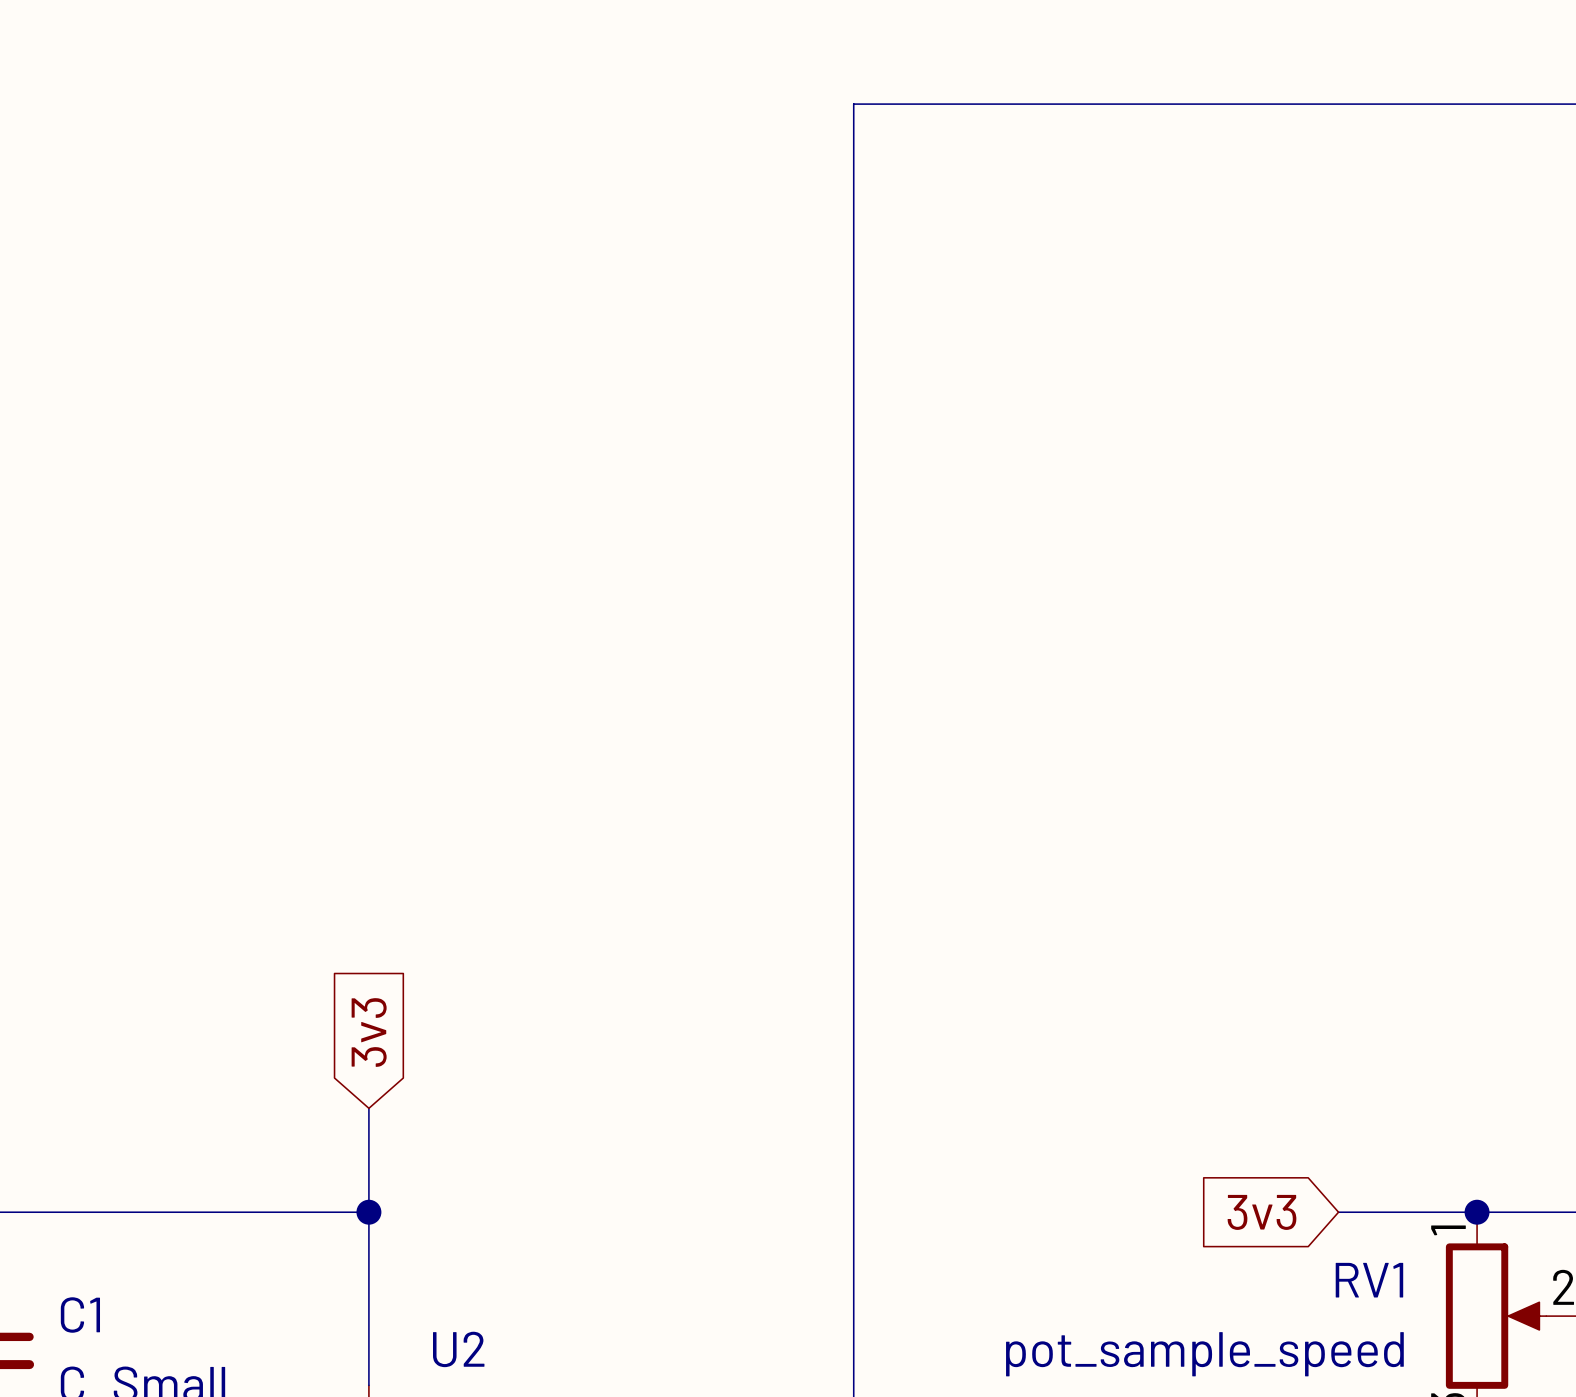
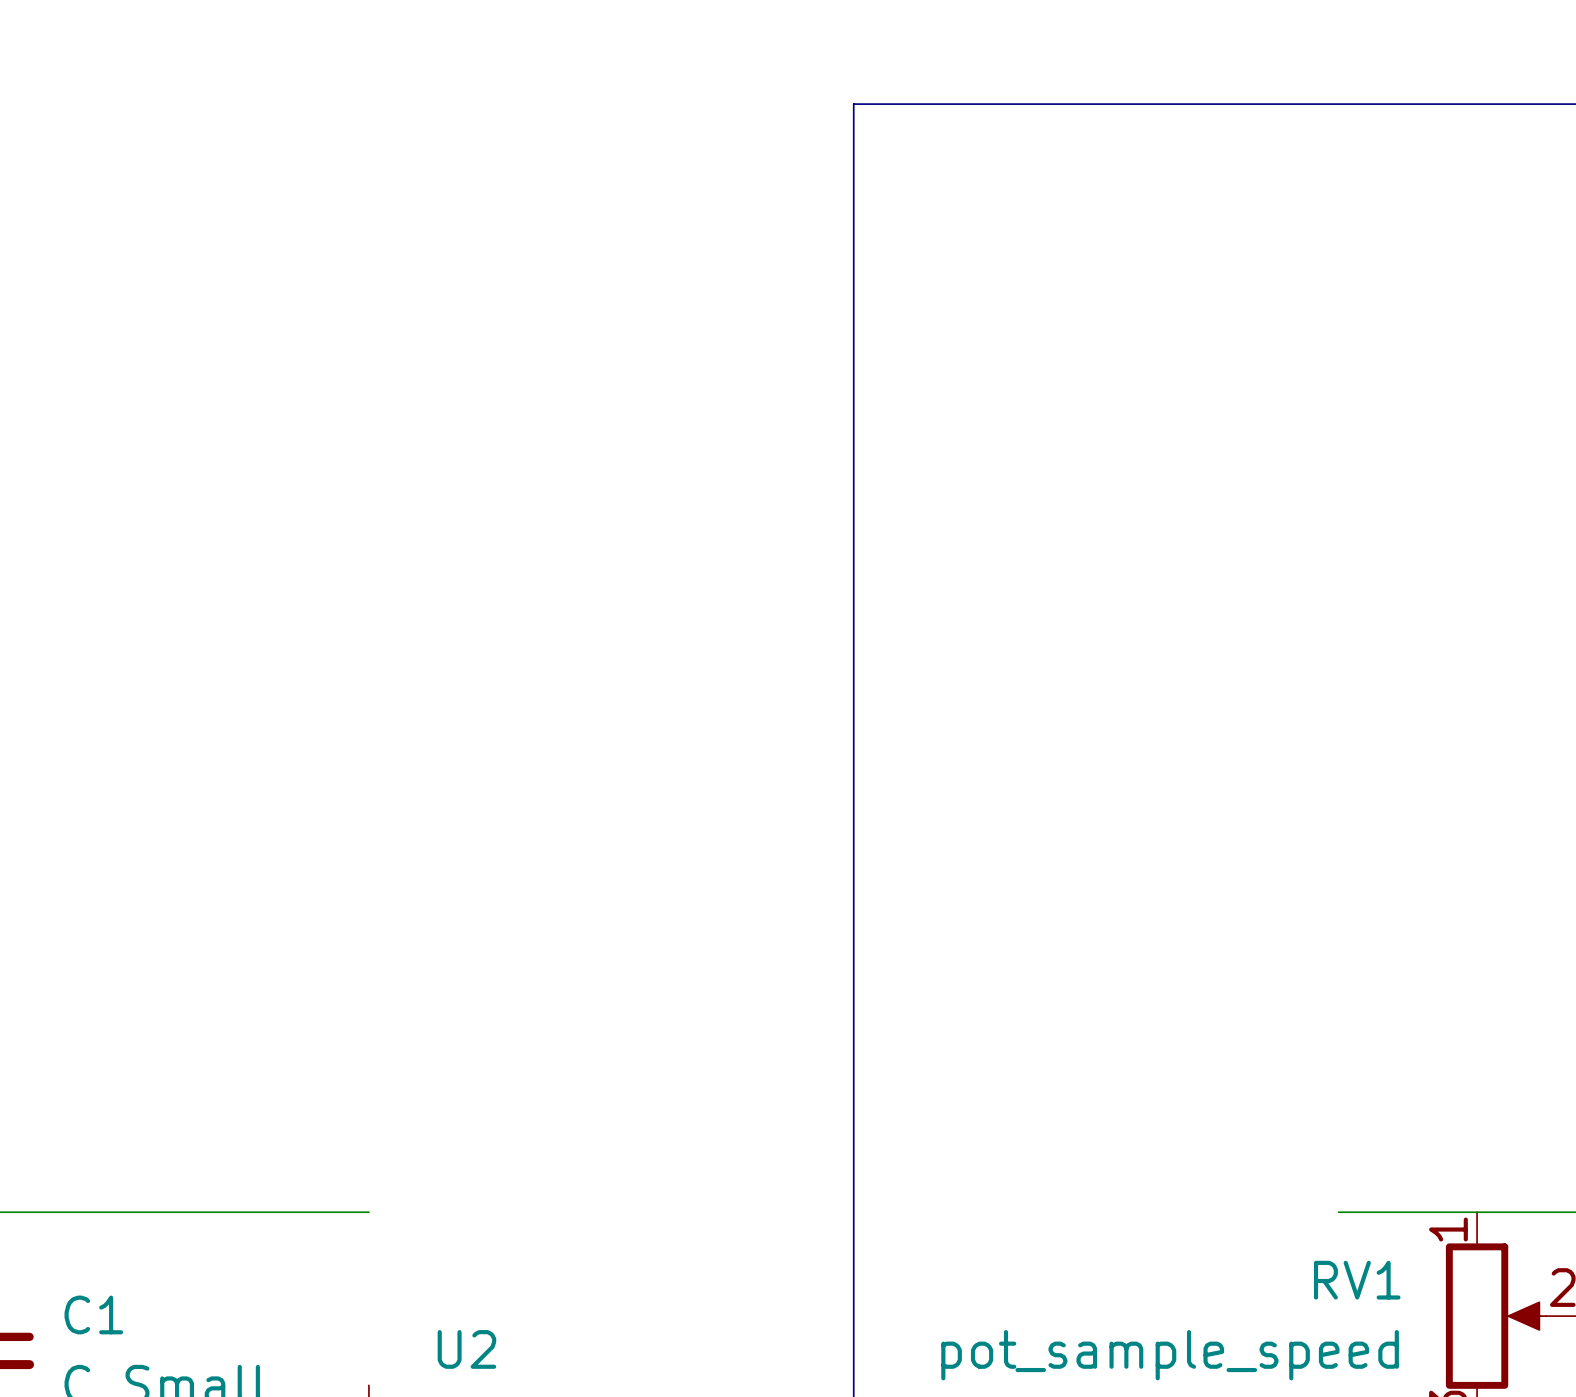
global label: 3v3 (369, 1032) -> none
wire: (368, 1108) (368, 1385) -> none
junction: (368, 1212) -> none
global label: 3v3 (1261, 1212) -> none
junction: (1477, 1212) -> none

